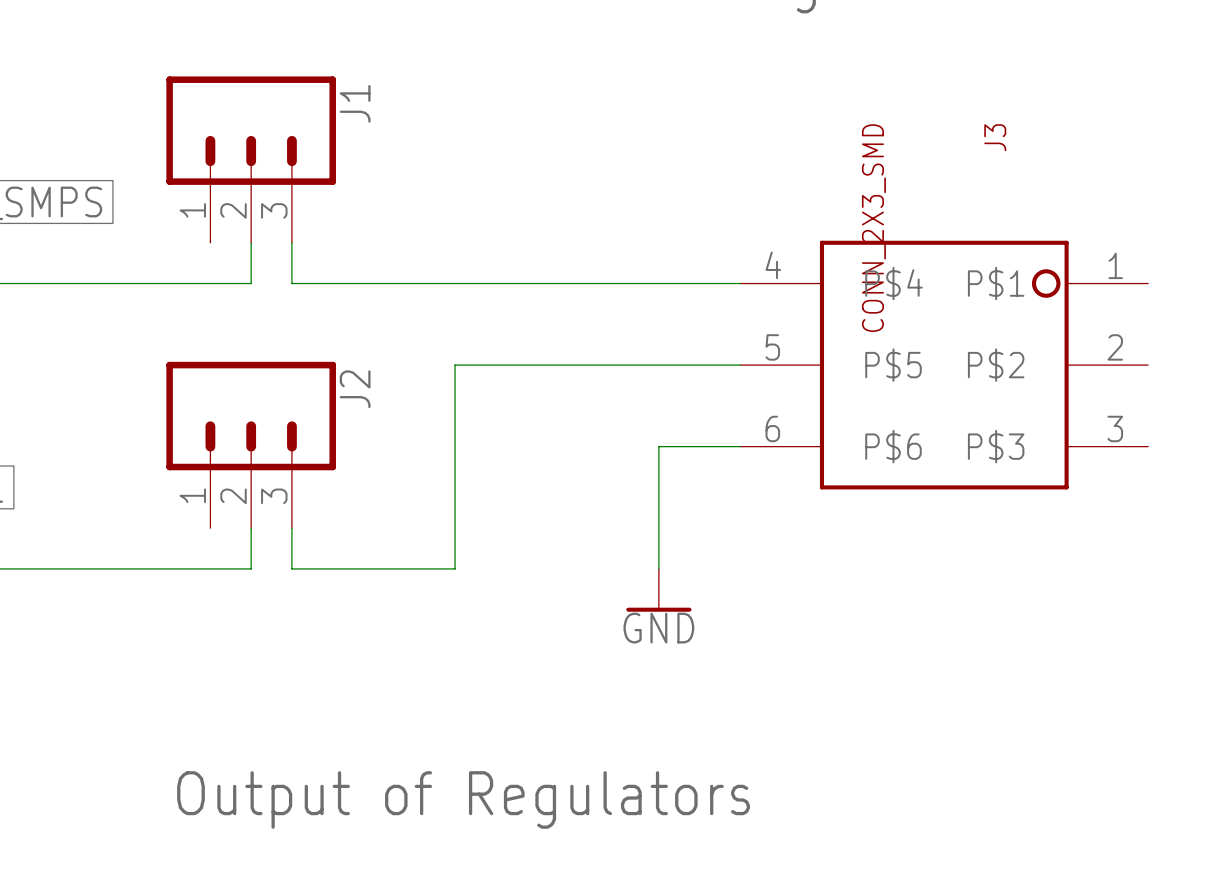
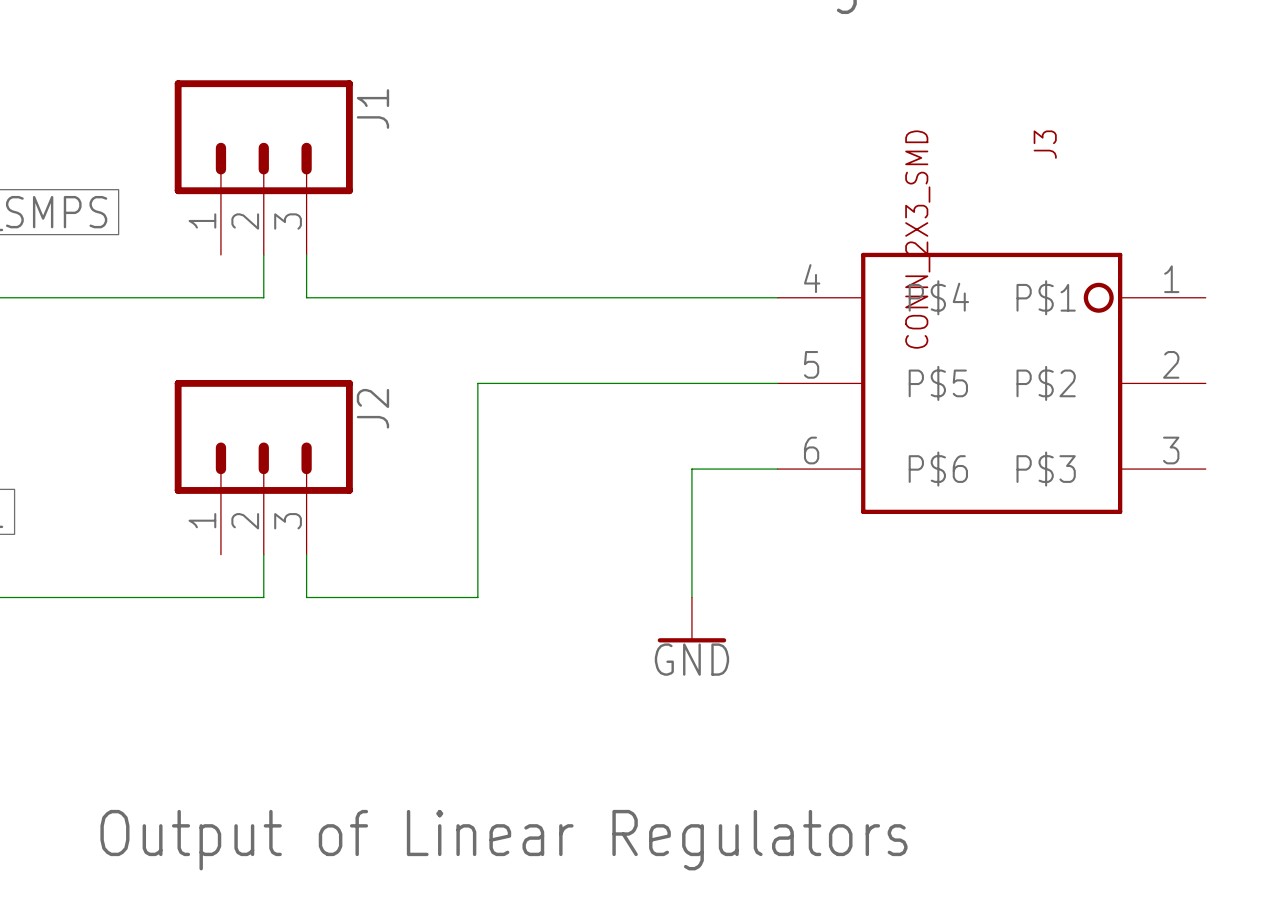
text: Output of Regulators (463, 799) -> Output of Linear Regulators (503, 840)

